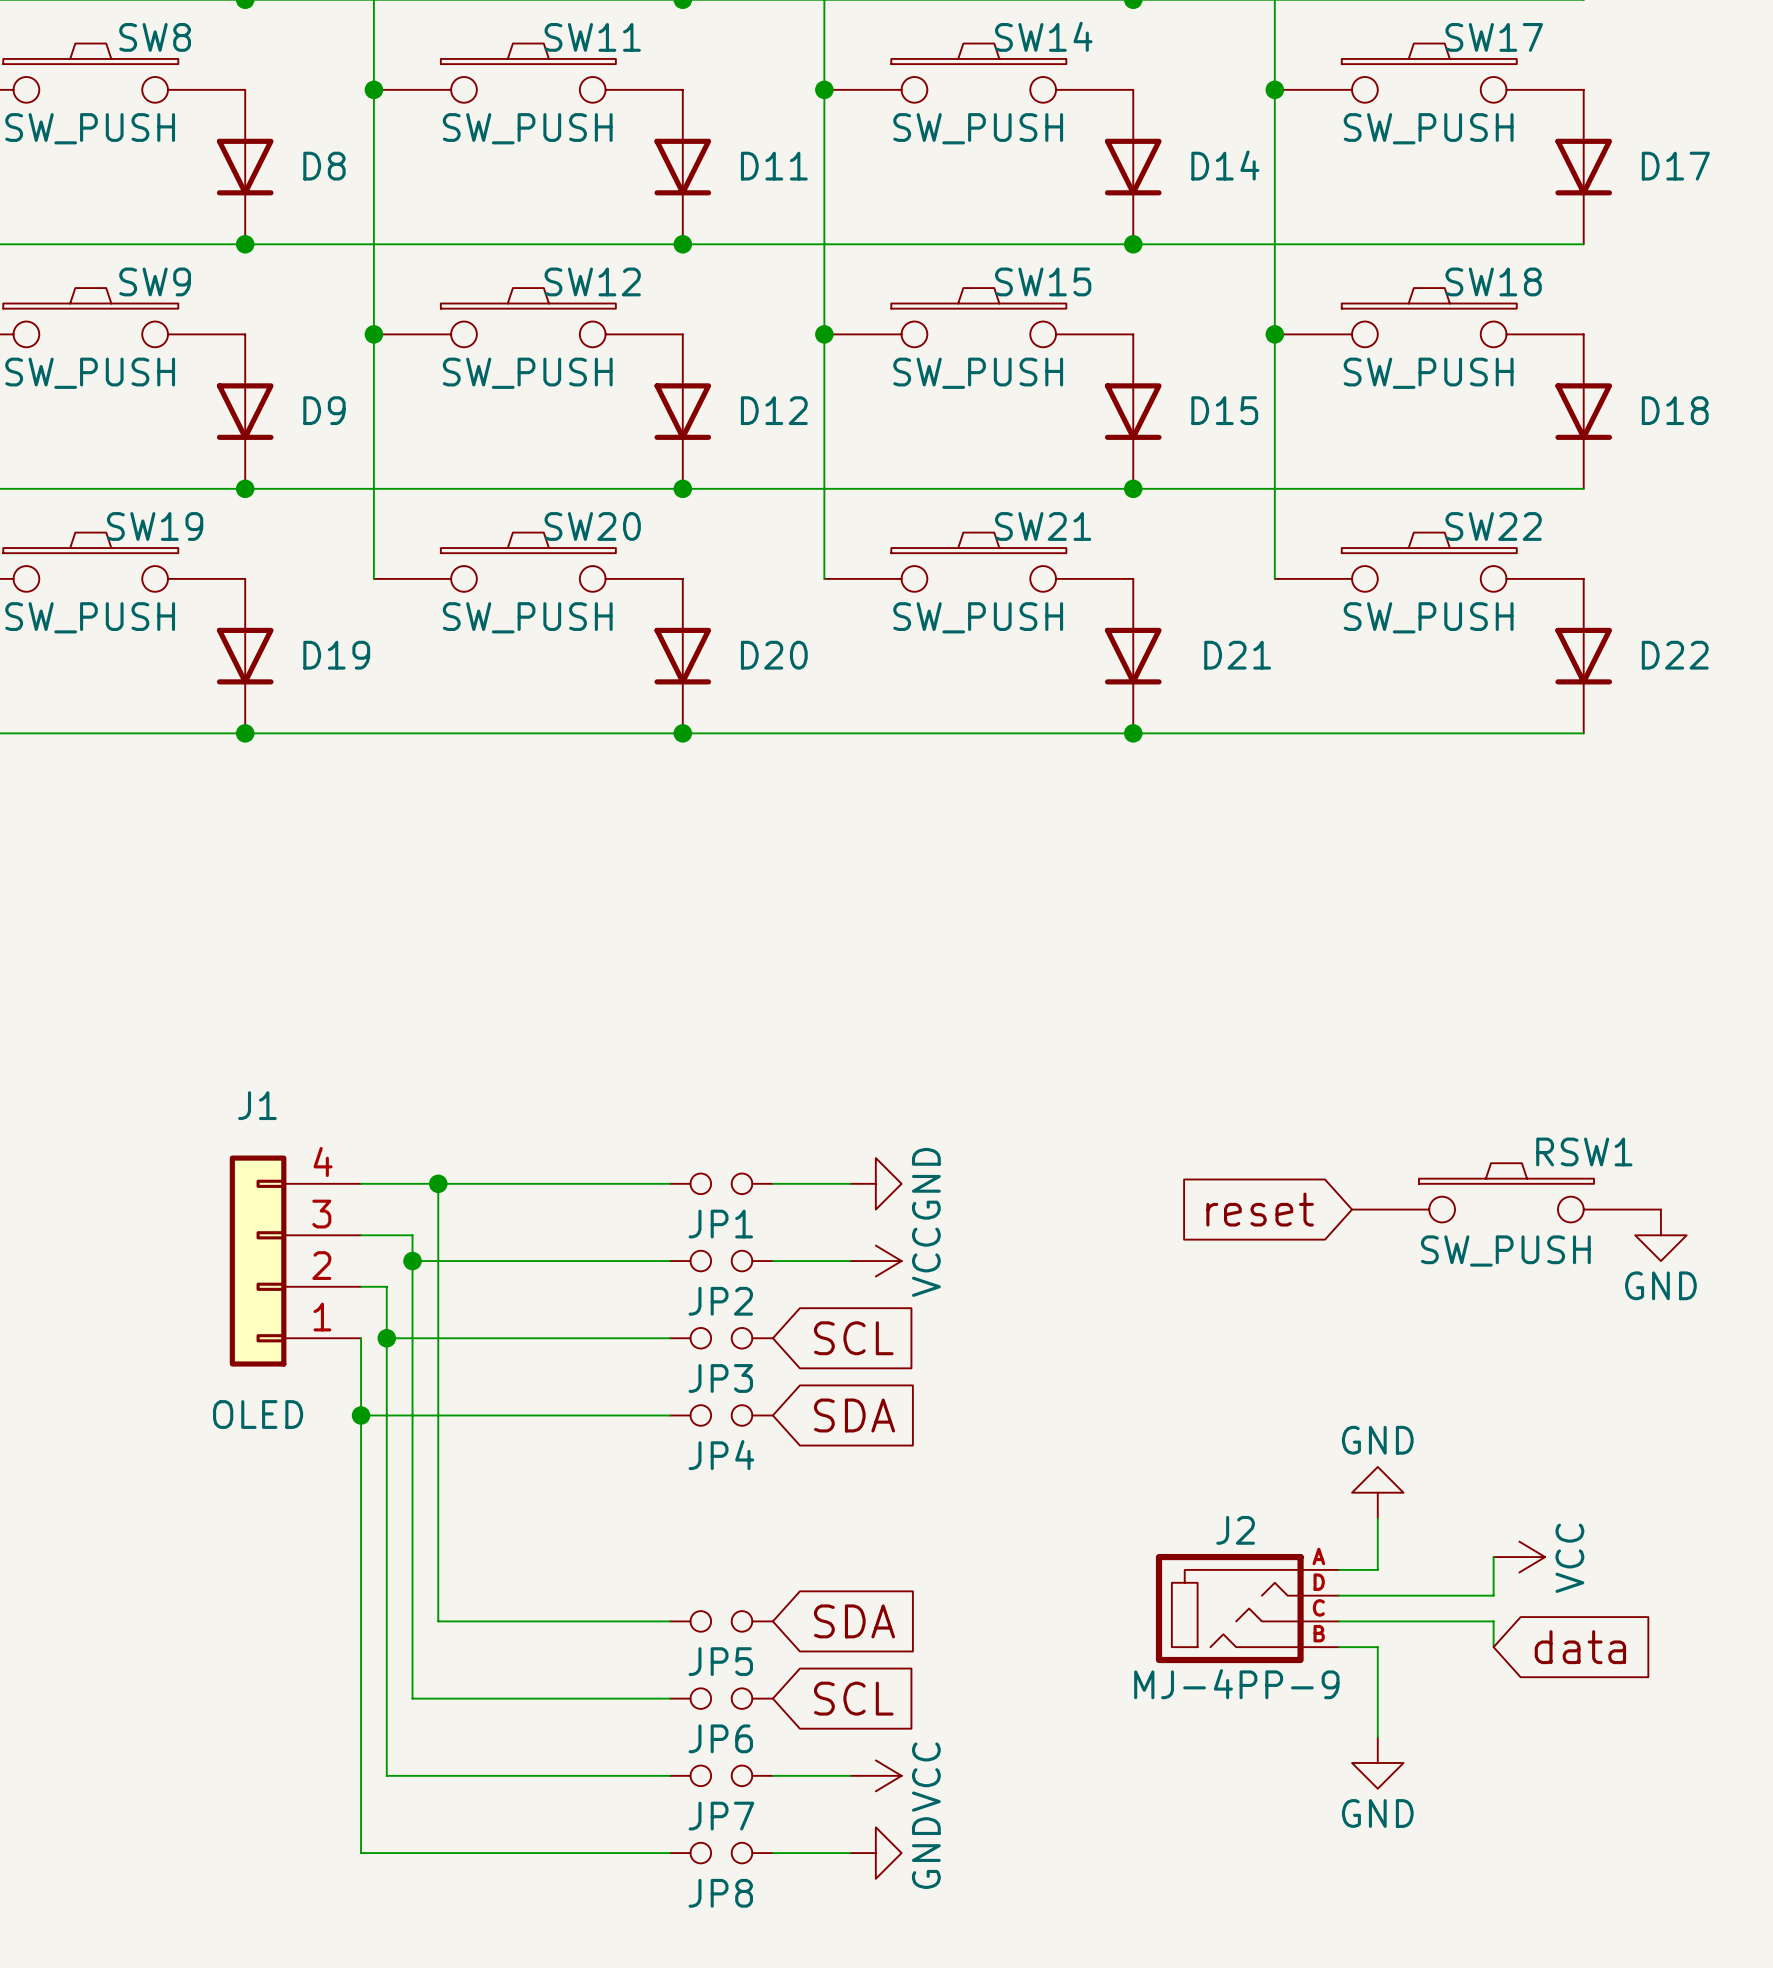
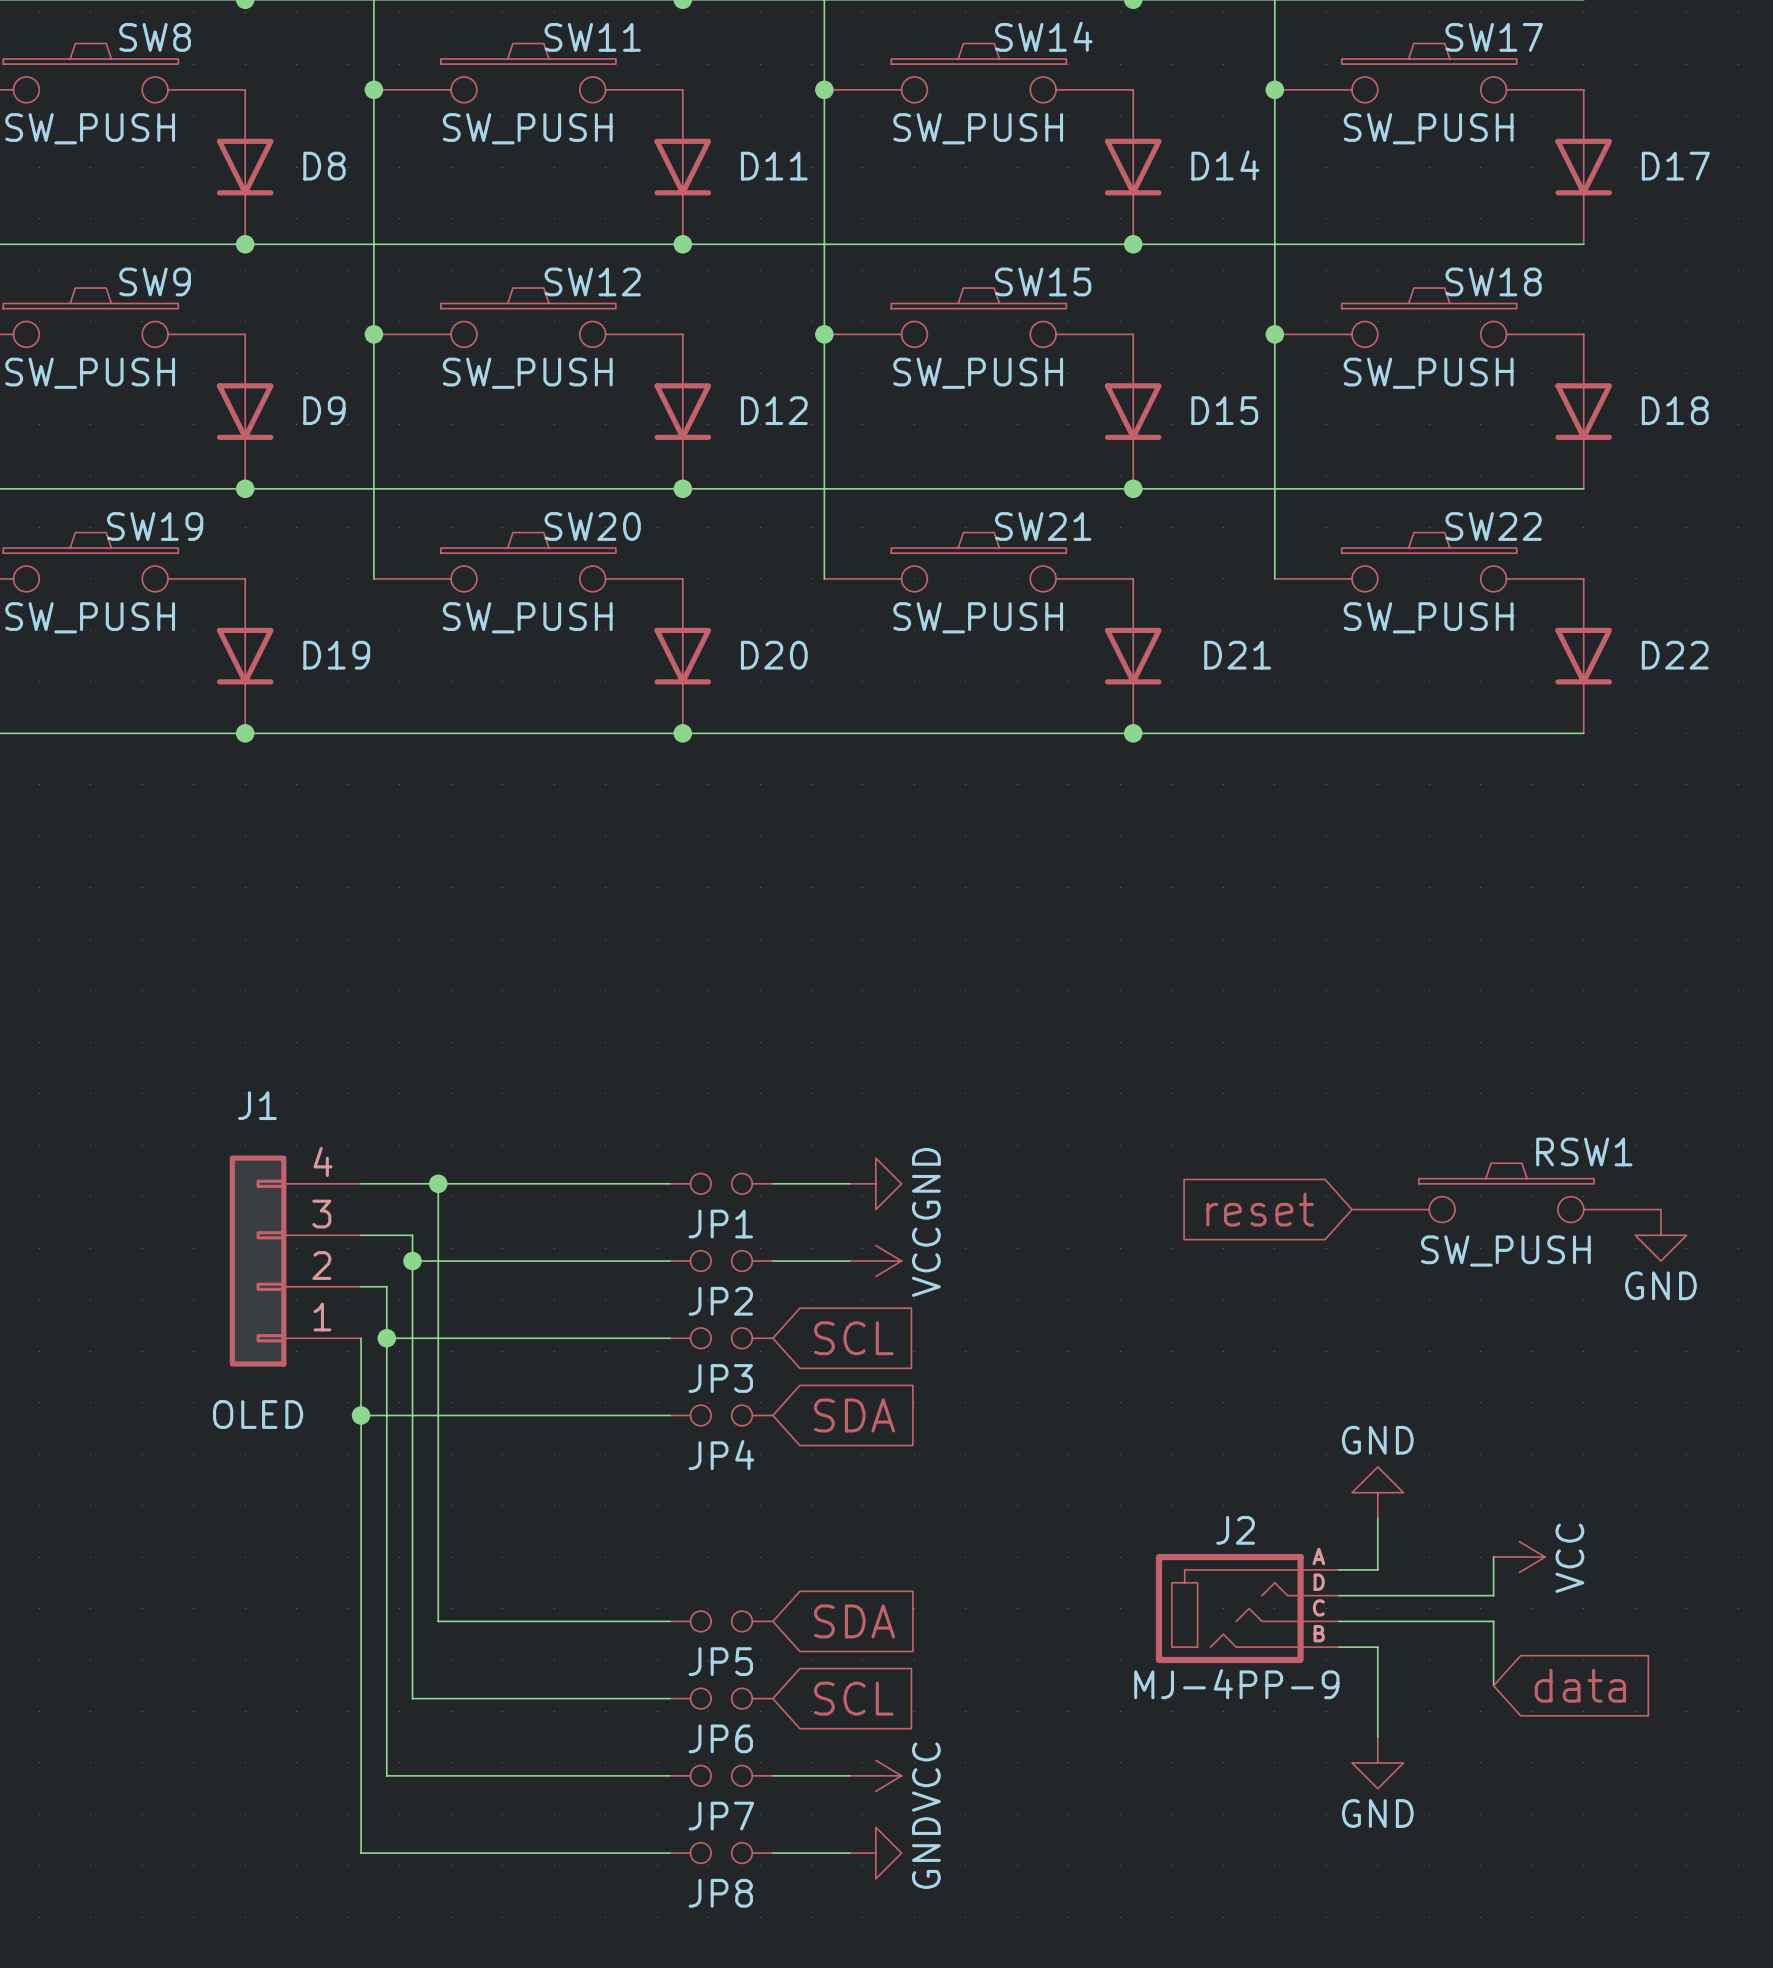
wire: none -> (1493, 1647) (1493, 1685)
global label position: data (1580, 1647) -> data (1580, 1685)

